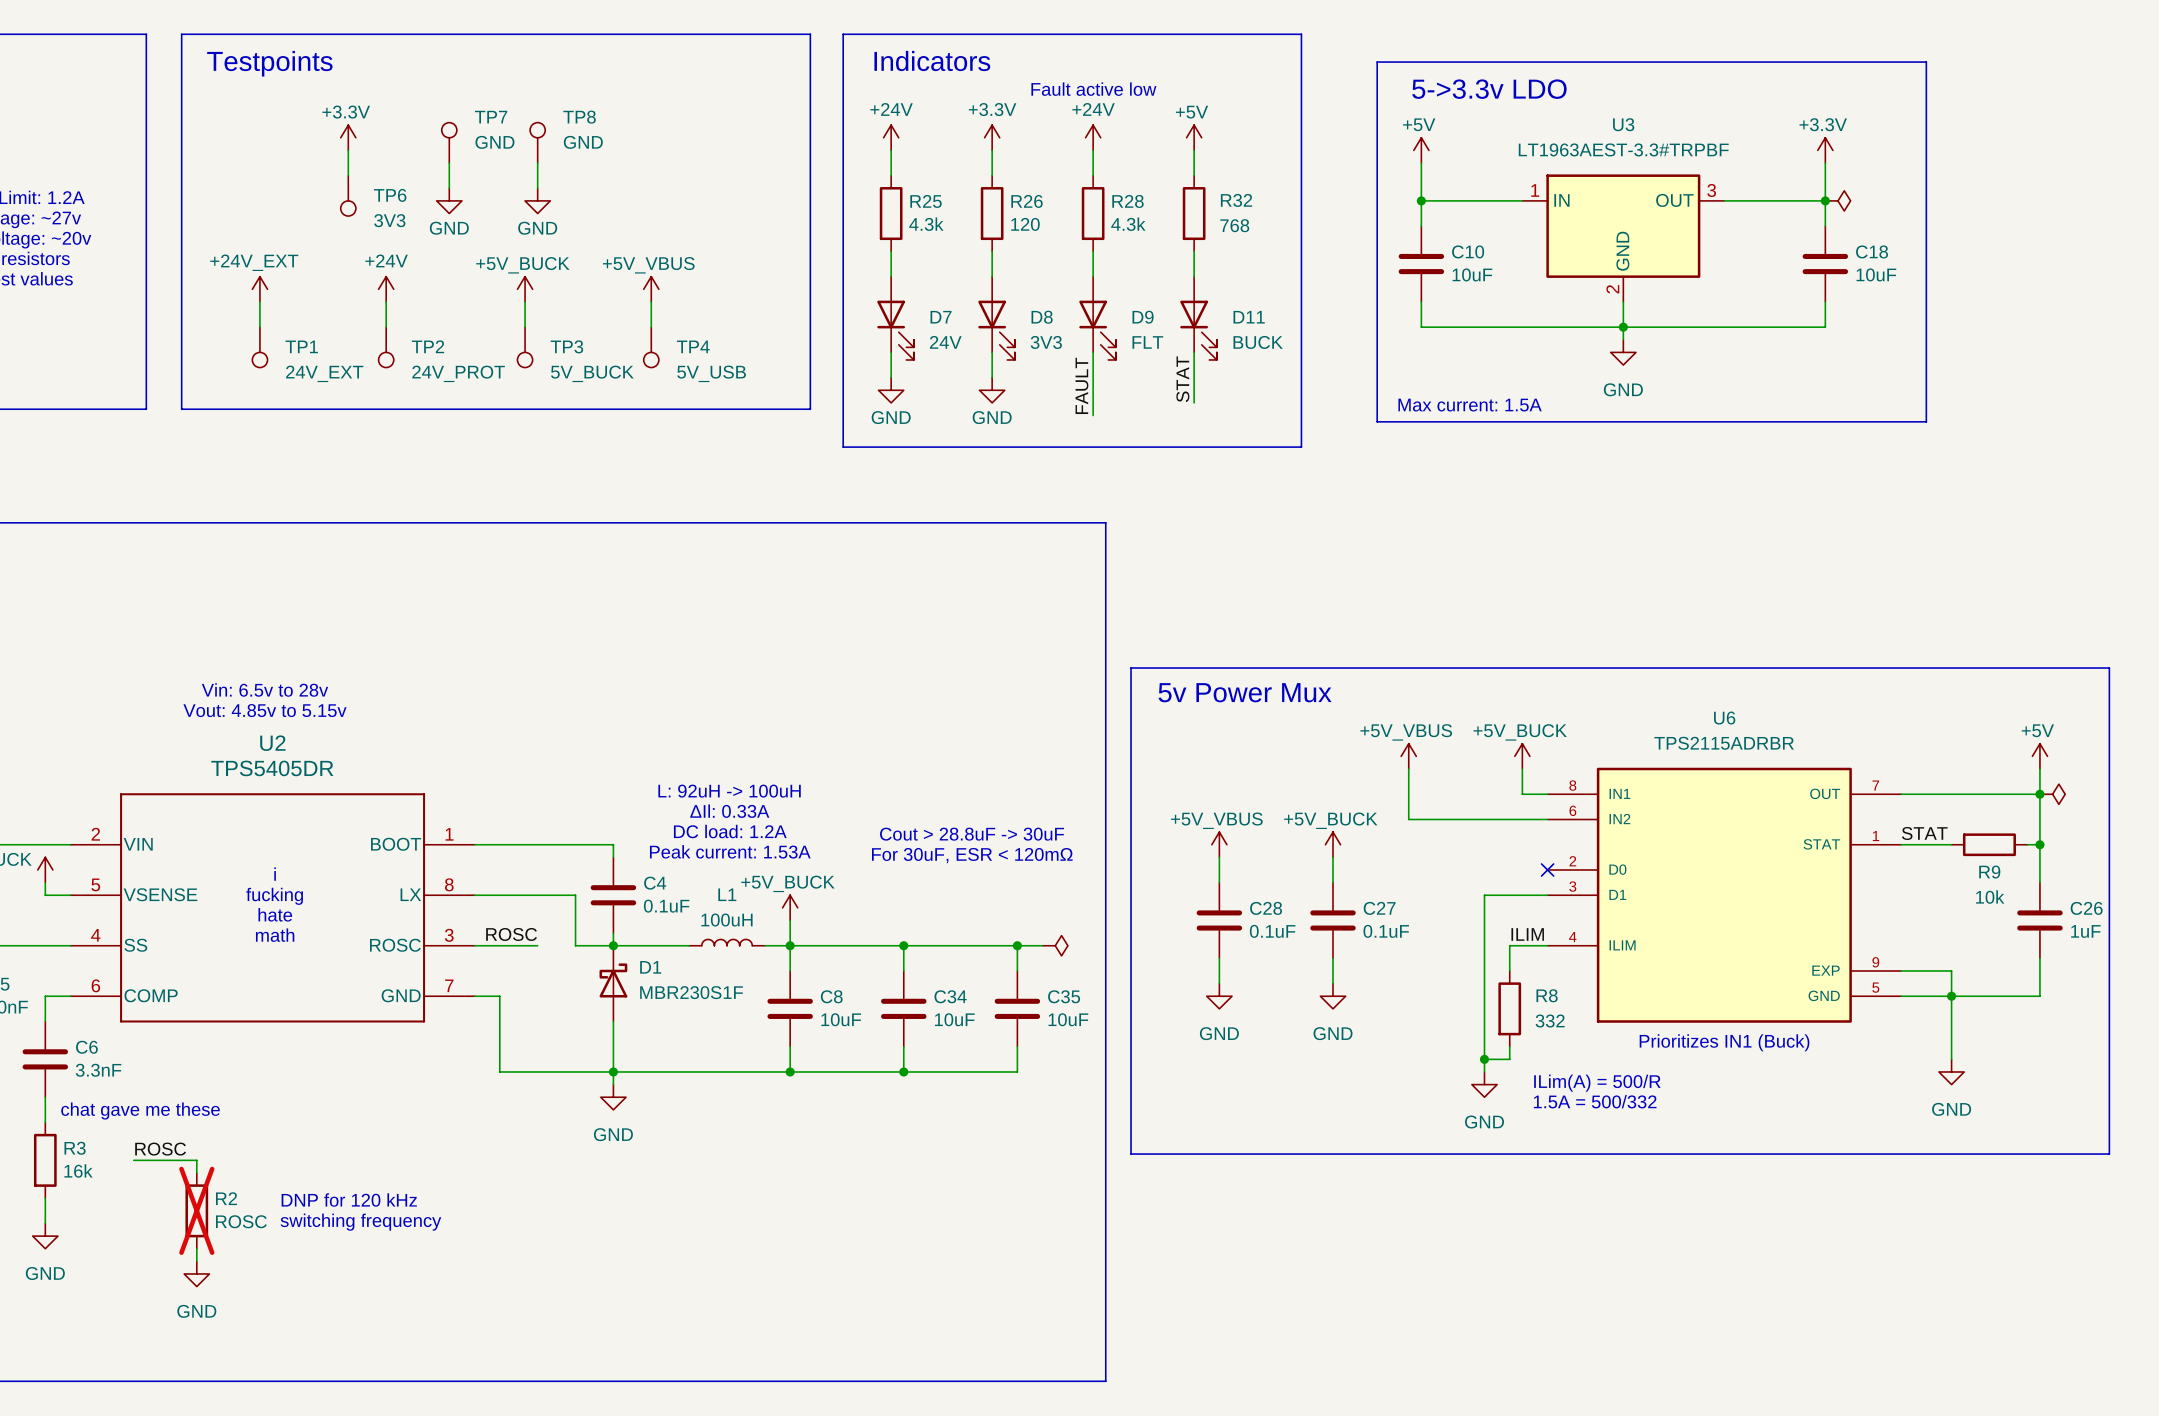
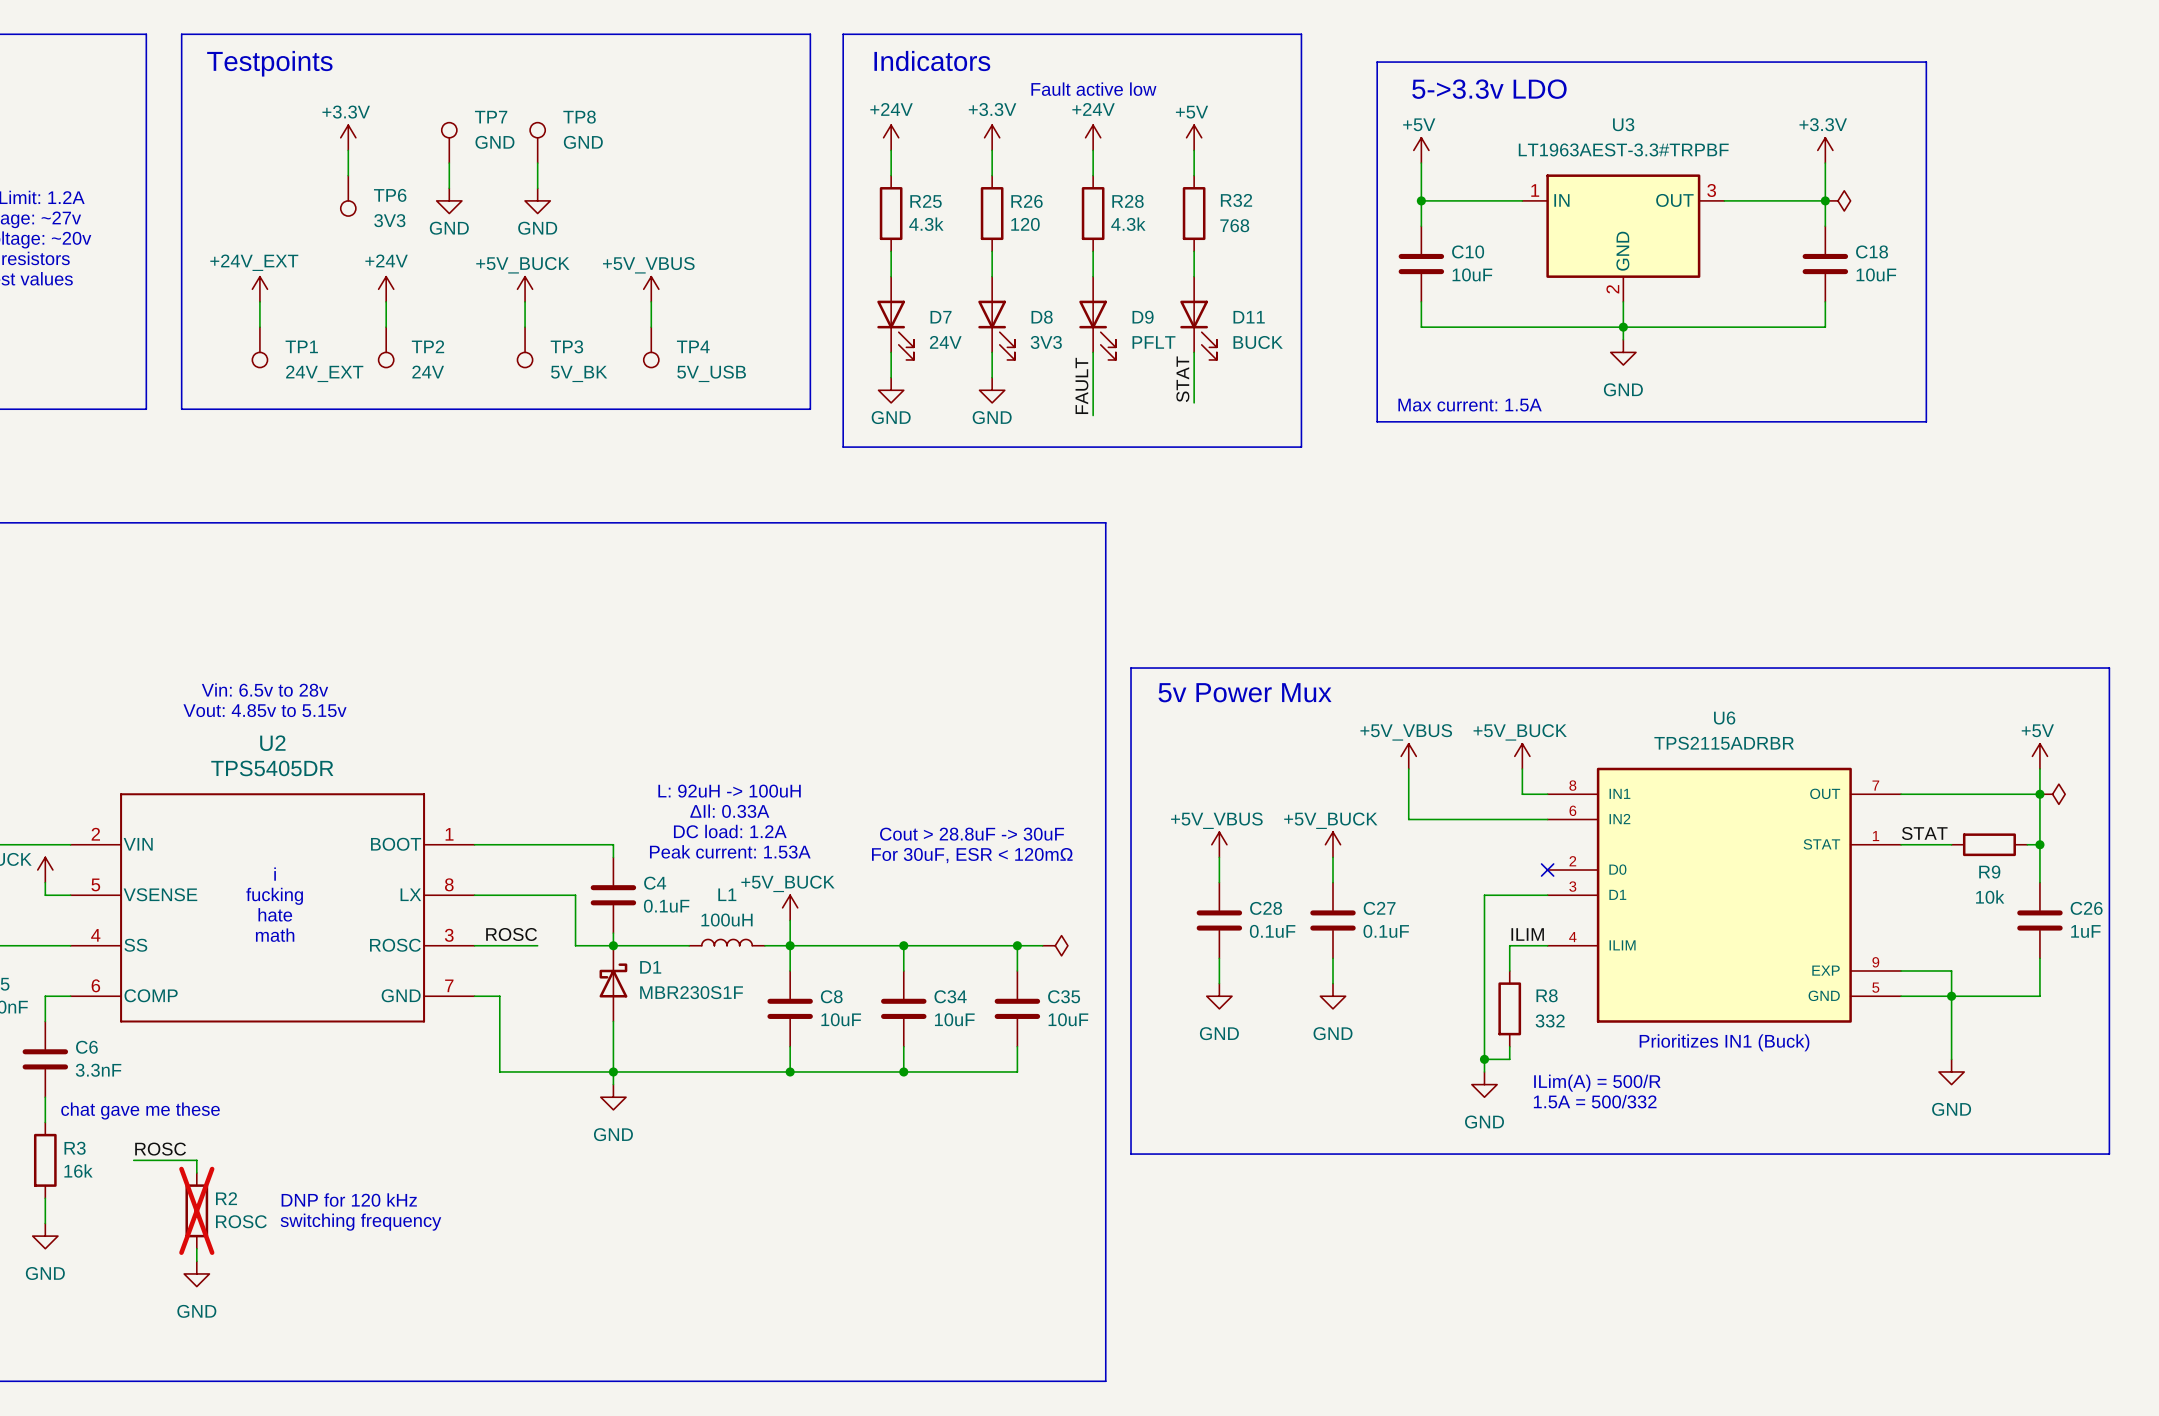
D9 value: FLT (1147, 342) -> PFLT (1153, 342)
TP2 value: 24V_PROT (458, 373) -> 24V (428, 372)
TP3 value: 5V_BUCK (592, 373) -> 5V_BK (579, 373)

